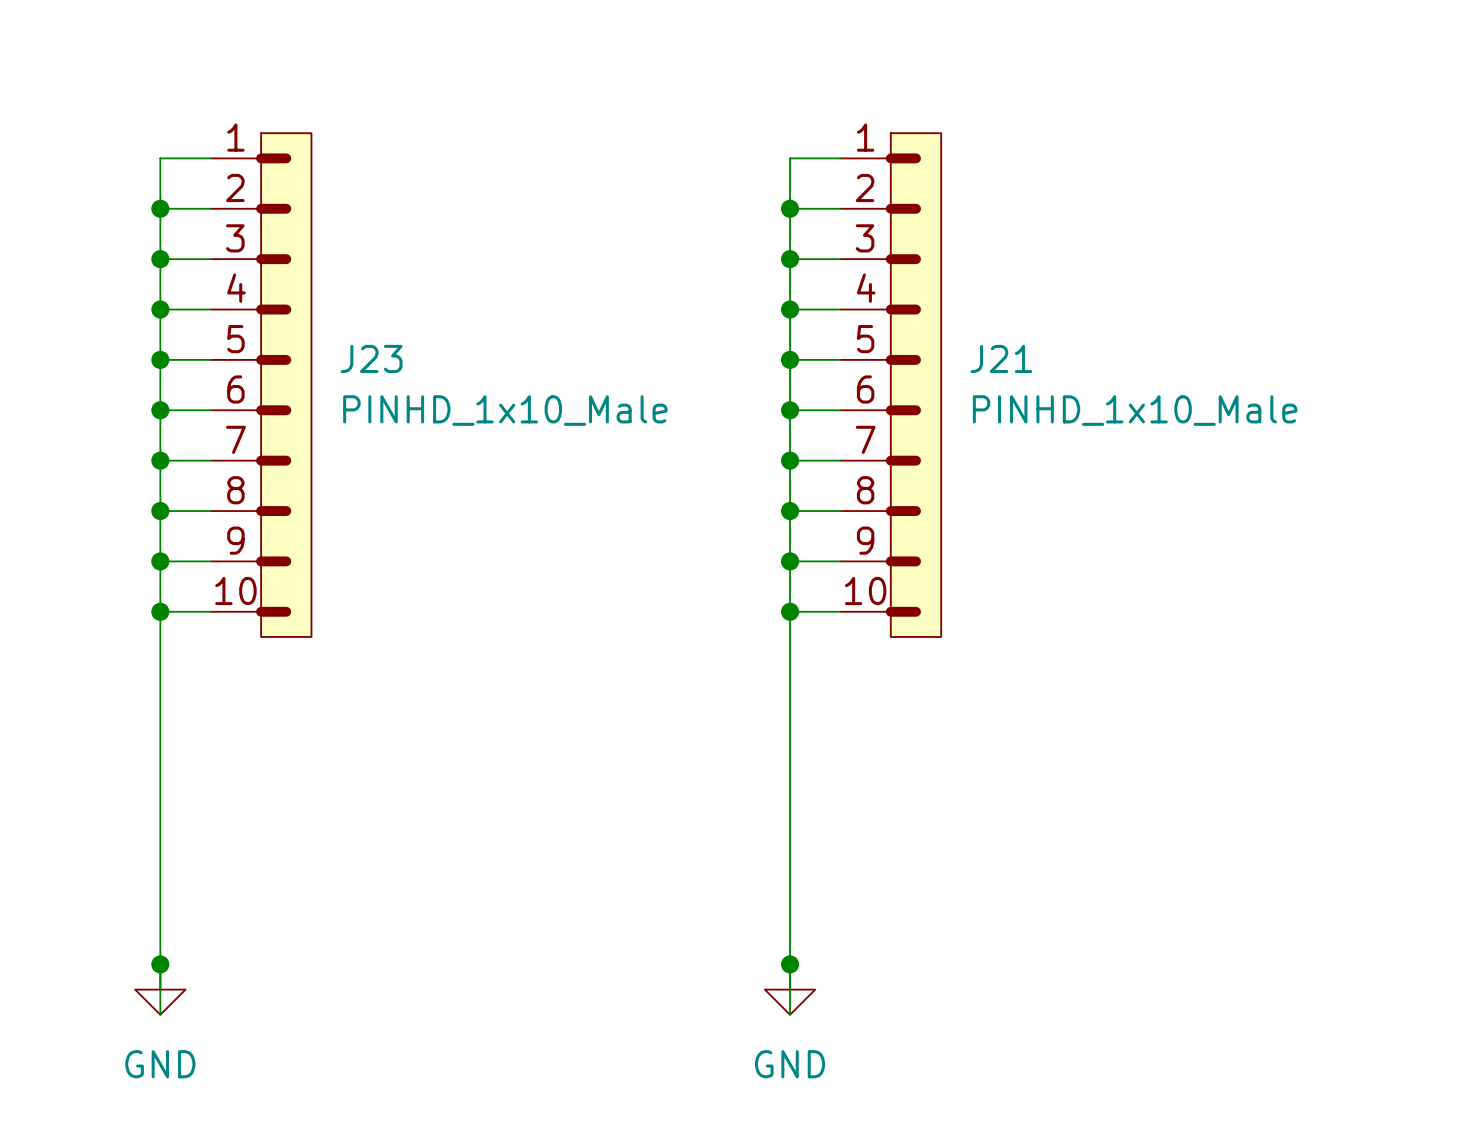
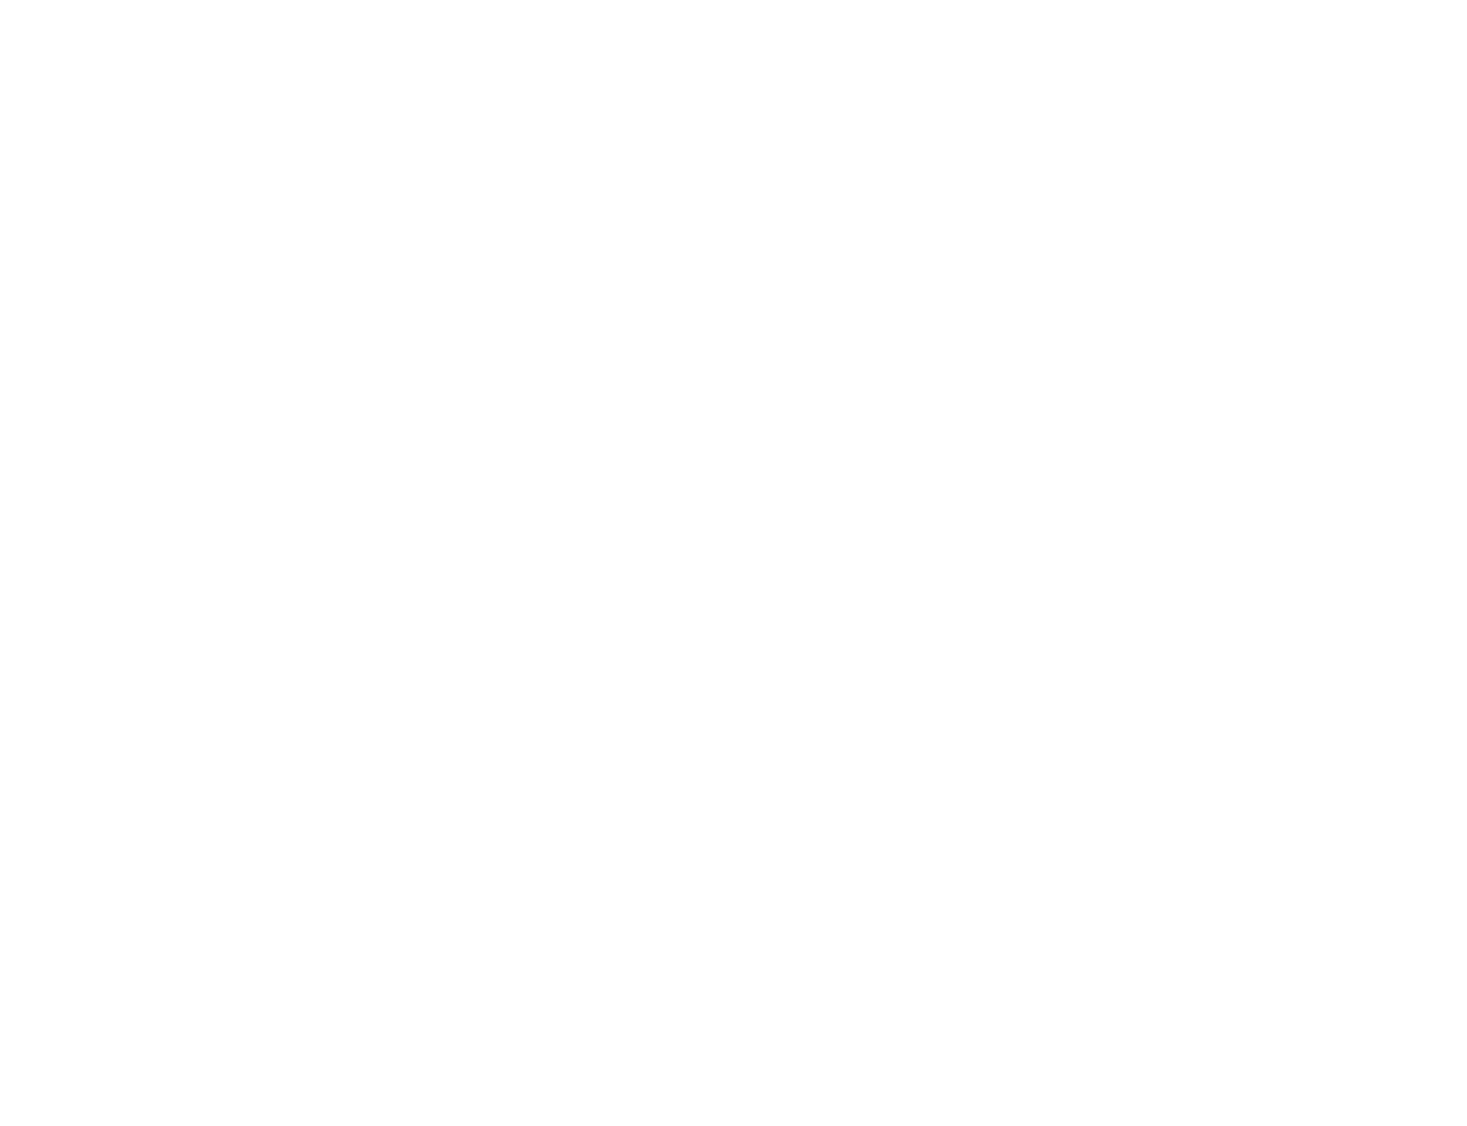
wire: (210, 158) (160, 158) (160, 1014) -> none
wire: (840, 158) (790, 158) (790, 1014) -> none
wire: (160, 208) (210, 208) -> none
junction: (160, 208) -> none
wire: (790, 208) (840, 208) -> none
junction: (790, 208) -> none
wire: (160, 259) (210, 259) -> none
junction: (160, 259) -> none
wire: (790, 259) (840, 259) -> none
junction: (790, 259) -> none
wire: (160, 309) (210, 309) -> none
junction: (160, 309) -> none
wire: (790, 309) (840, 309) -> none
junction: (790, 309) -> none
wire: (160, 359) (210, 359) -> none
junction: (160, 359) -> none
wire: (790, 359) (840, 359) -> none
junction: (790, 359) -> none
J23: PINHD_1x10_Male (261, 385) -> none
J21: PINHD_1x10_Male (890, 385) -> none
wire: (160, 410) (210, 410) -> none
junction: (160, 410) -> none
wire: (790, 410) (840, 410) -> none
junction: (790, 410) -> none
wire: (160, 460) (210, 460) -> none
junction: (160, 460) -> none
wire: (790, 460) (840, 460) -> none
junction: (790, 460) -> none
wire: (160, 511) (210, 511) -> none
junction: (160, 511) -> none
wire: (790, 511) (840, 511) -> none
junction: (790, 511) -> none
wire: (160, 561) (210, 561) -> none
junction: (160, 561) -> none
wire: (790, 561) (840, 561) -> none
junction: (790, 561) -> none
wire: (160, 611) (210, 611) -> none
junction: (160, 611) -> none
wire: (790, 611) (840, 611) -> none
junction: (790, 611) -> none
junction: (160, 964) -> none
junction: (790, 964) -> none
power symbol: GND (160, 989) -> none
power symbol: GND (790, 989) -> none

